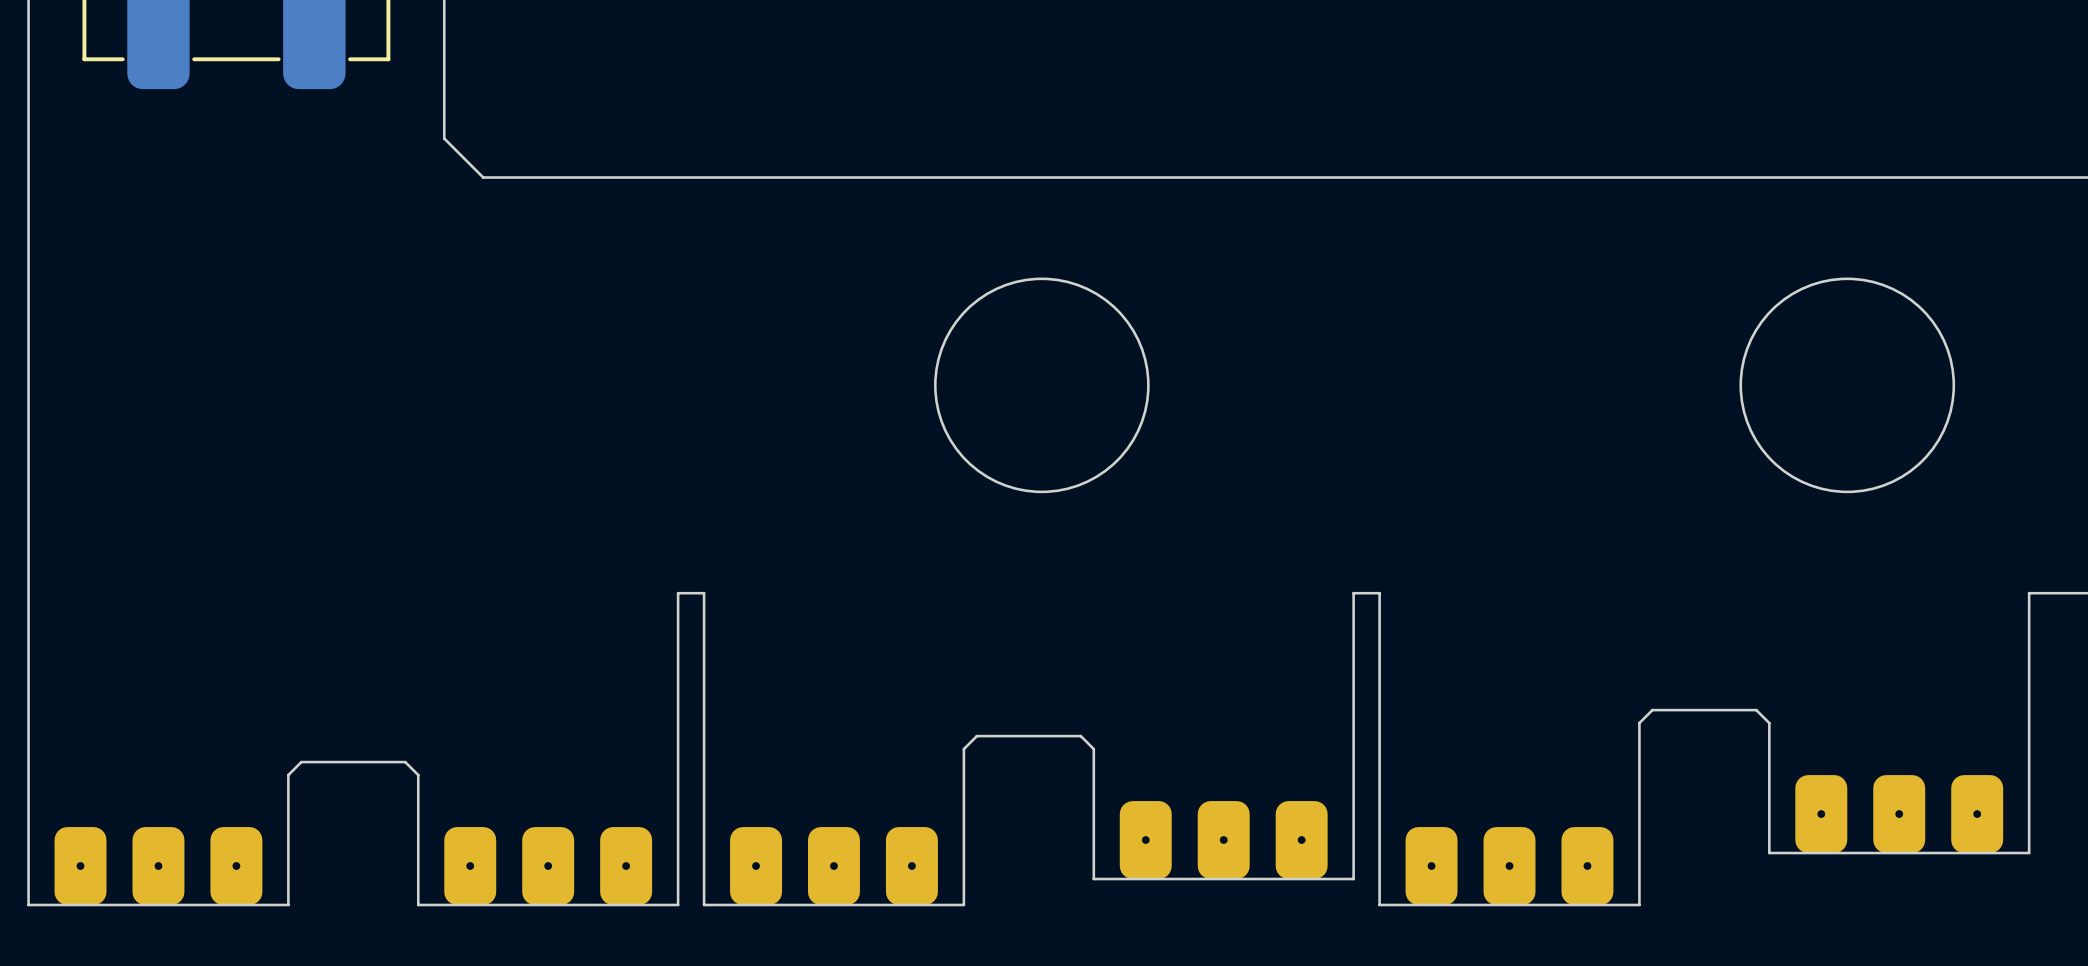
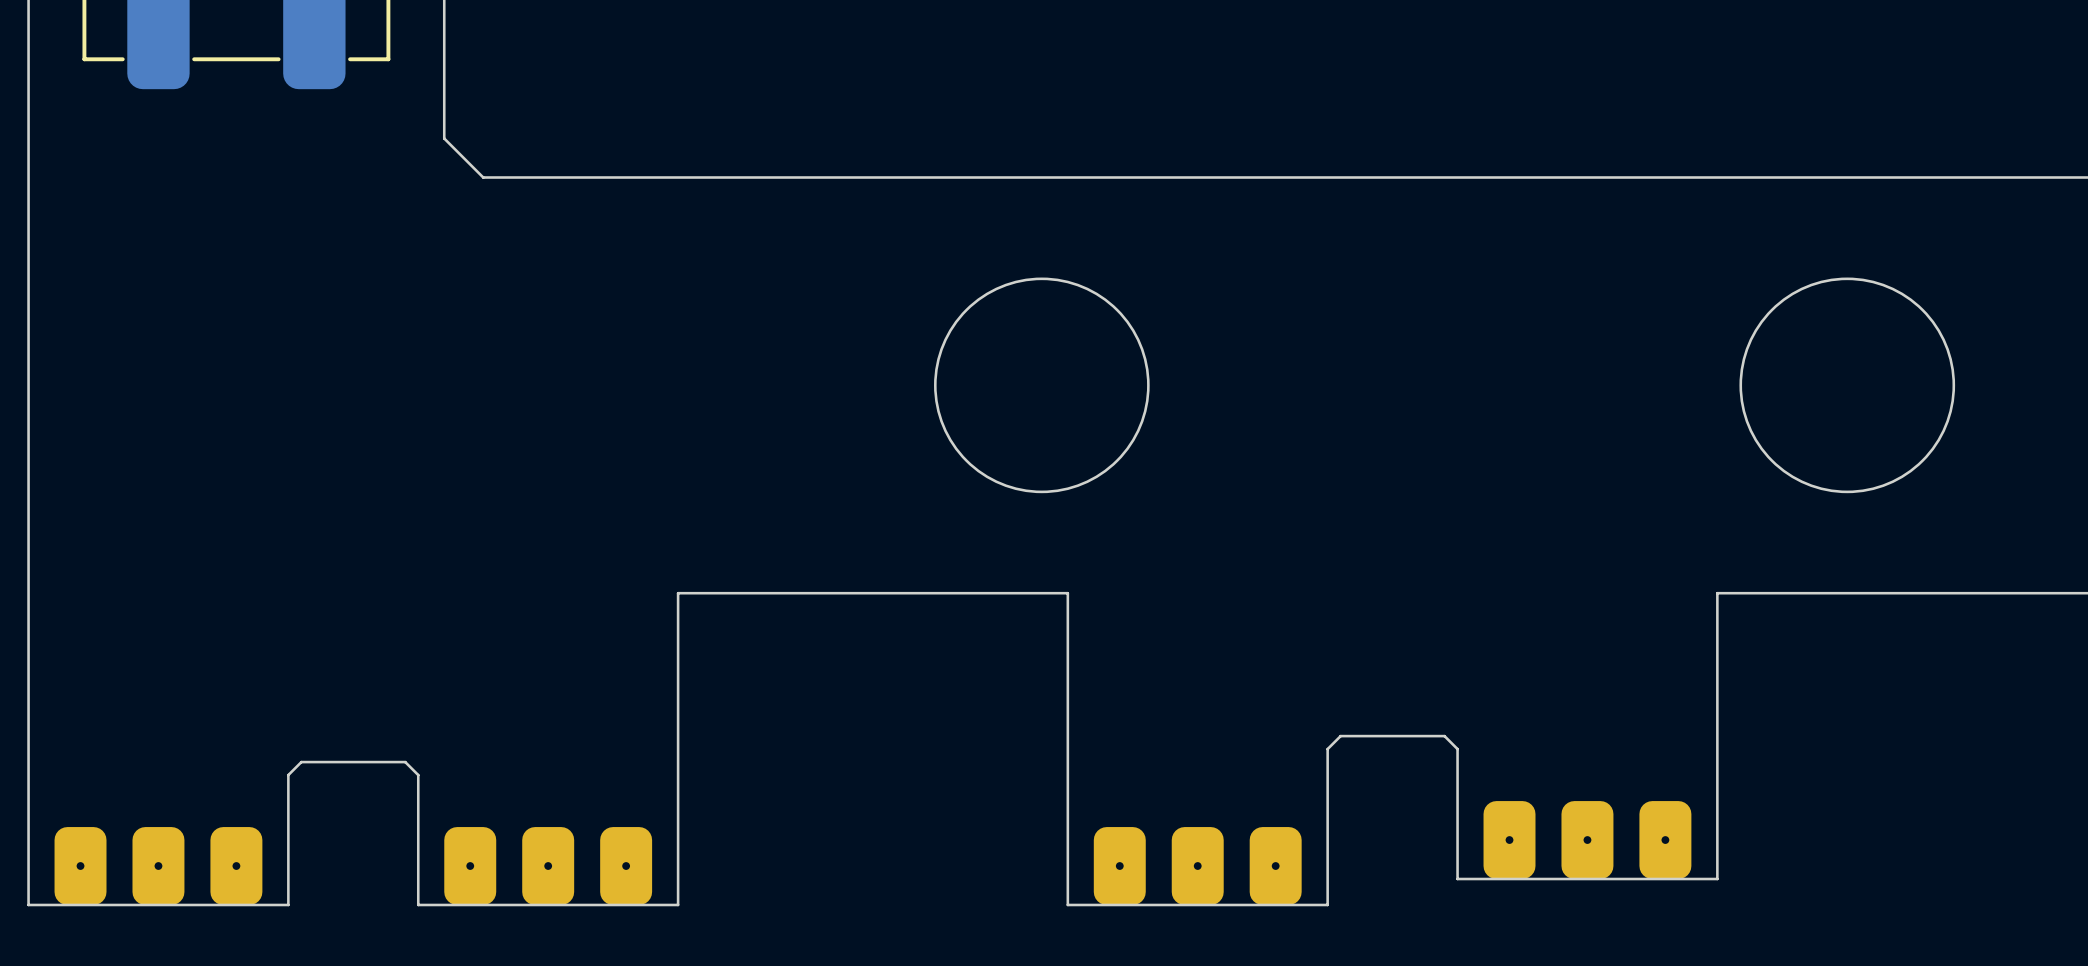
board edge: (2029, 593) (2029, 853) (1769, 853) (1769, 723) (1756, 710) (1652, 710) (1639, 723) (1639, 904) (1379, 904) (1379, 593) (1353, 593) (1353, 879) (1093, 879) (1093, 749) (1080, 736) (976, 736) (963, 749) (963, 904) (704, 904) (704, 593) -> (2029, 593) (1717, 593) (1717, 879) (1457, 879) (1457, 749) (1444, 736) (1340, 736) (1327, 749) (1327, 904) (1067, 904) (1067, 593) (704, 593)
part: (1899, 814) -> none
part position: (1223, 840) -> (1197, 866)
part: (833, 866) -> none
part position: (1509, 866) -> (1587, 840)

